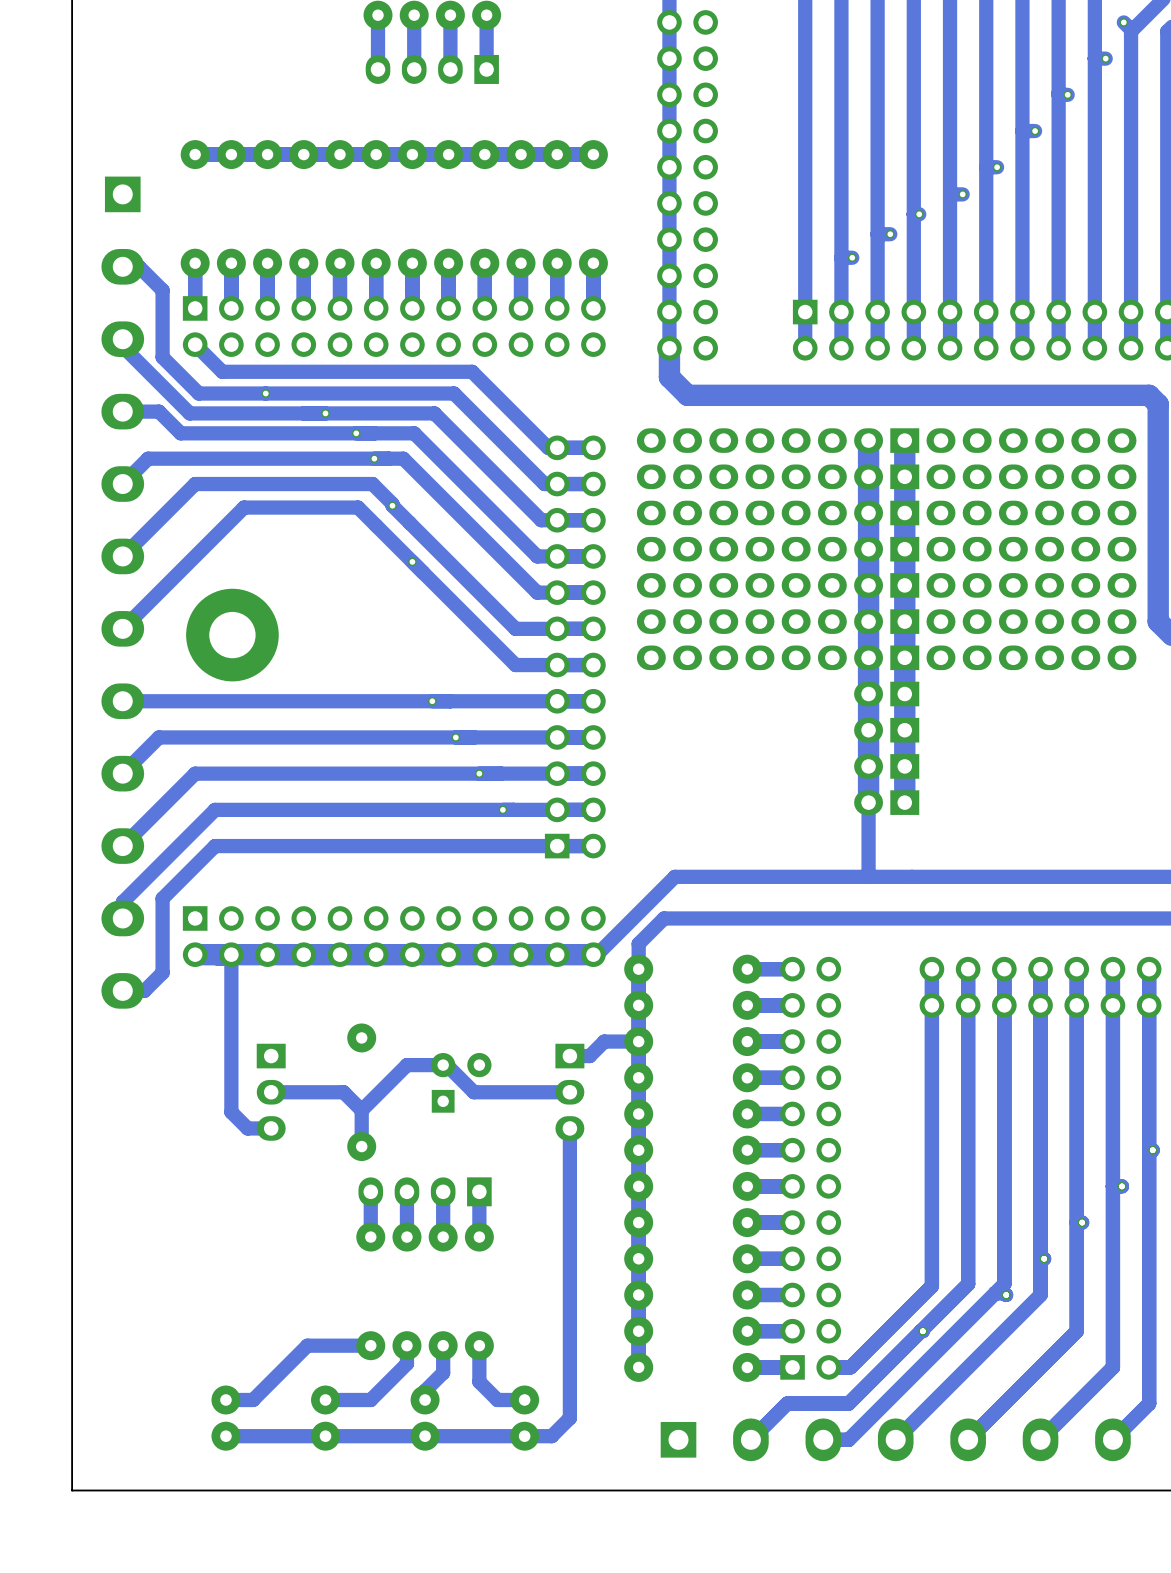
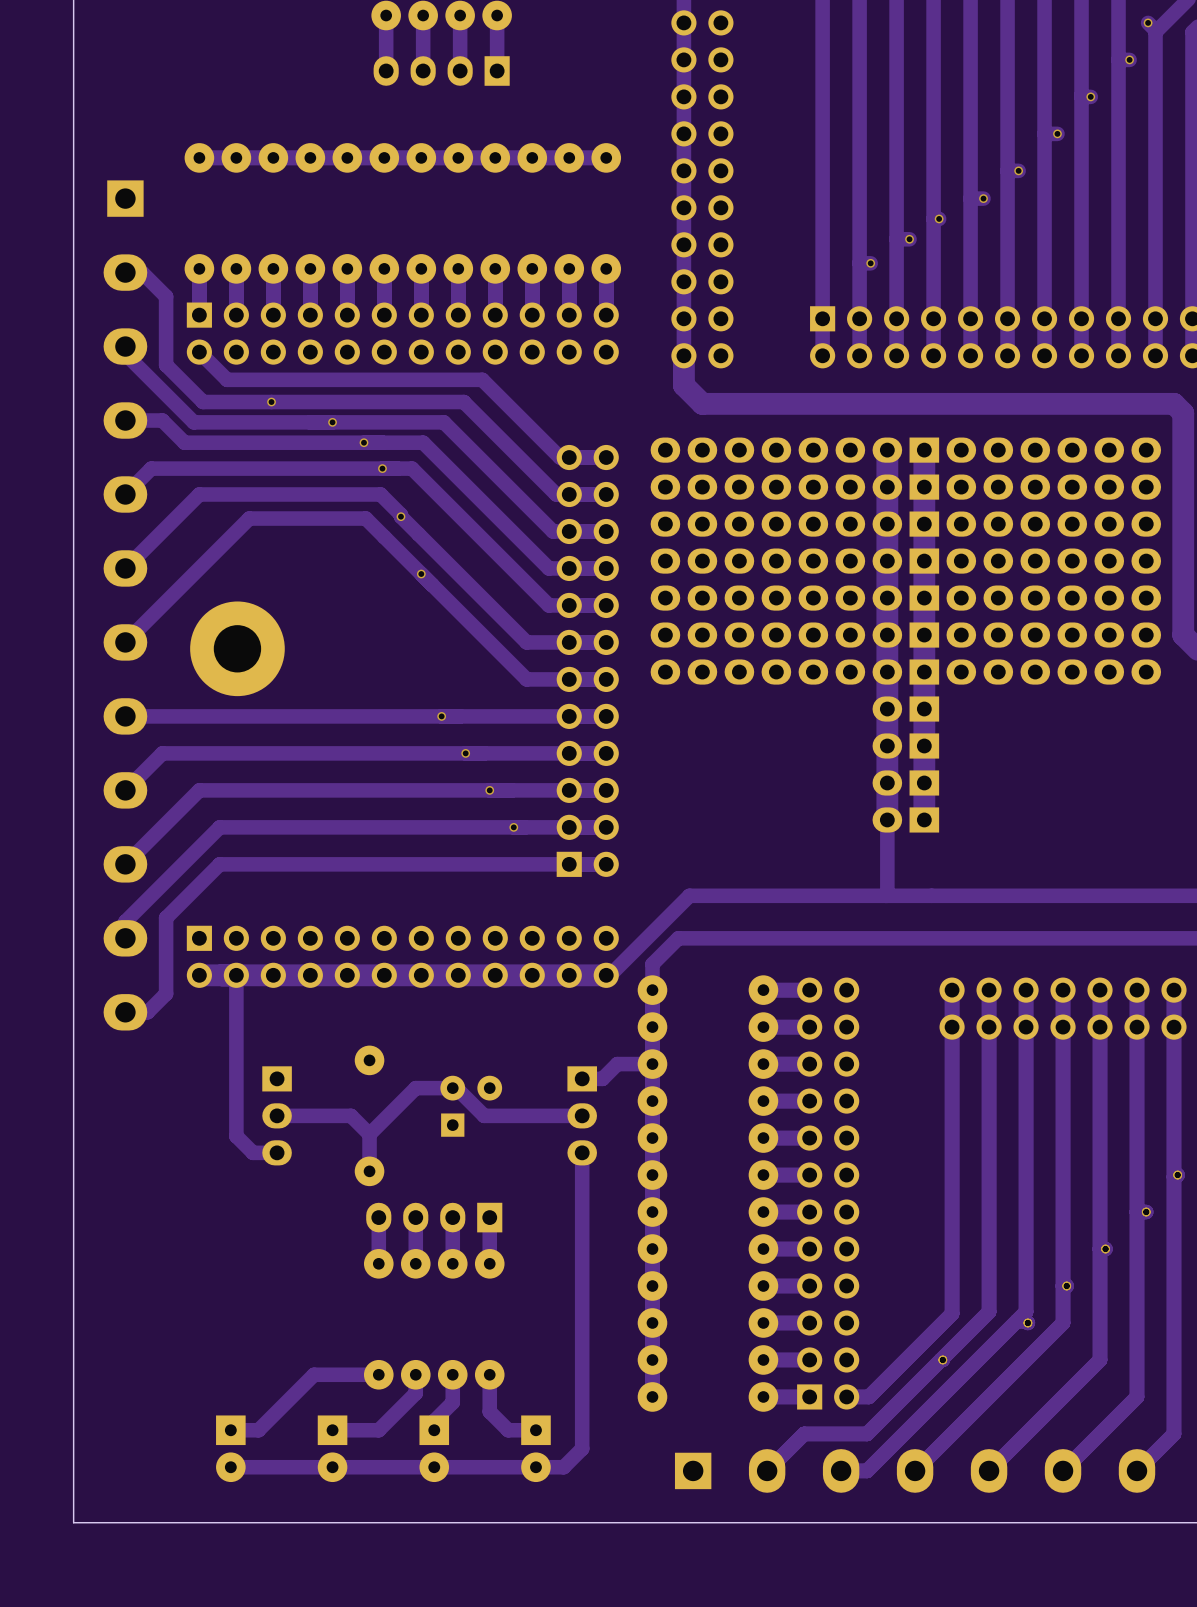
part footprint: [211, 1385, 241, 1451] -> [216, 1415, 246, 1483]
part footprint: [311, 1385, 340, 1451] -> [317, 1415, 348, 1483]
part footprint: [410, 1385, 440, 1451] -> [419, 1415, 450, 1483]
part footprint: [510, 1385, 540, 1451] -> [521, 1415, 551, 1483]

